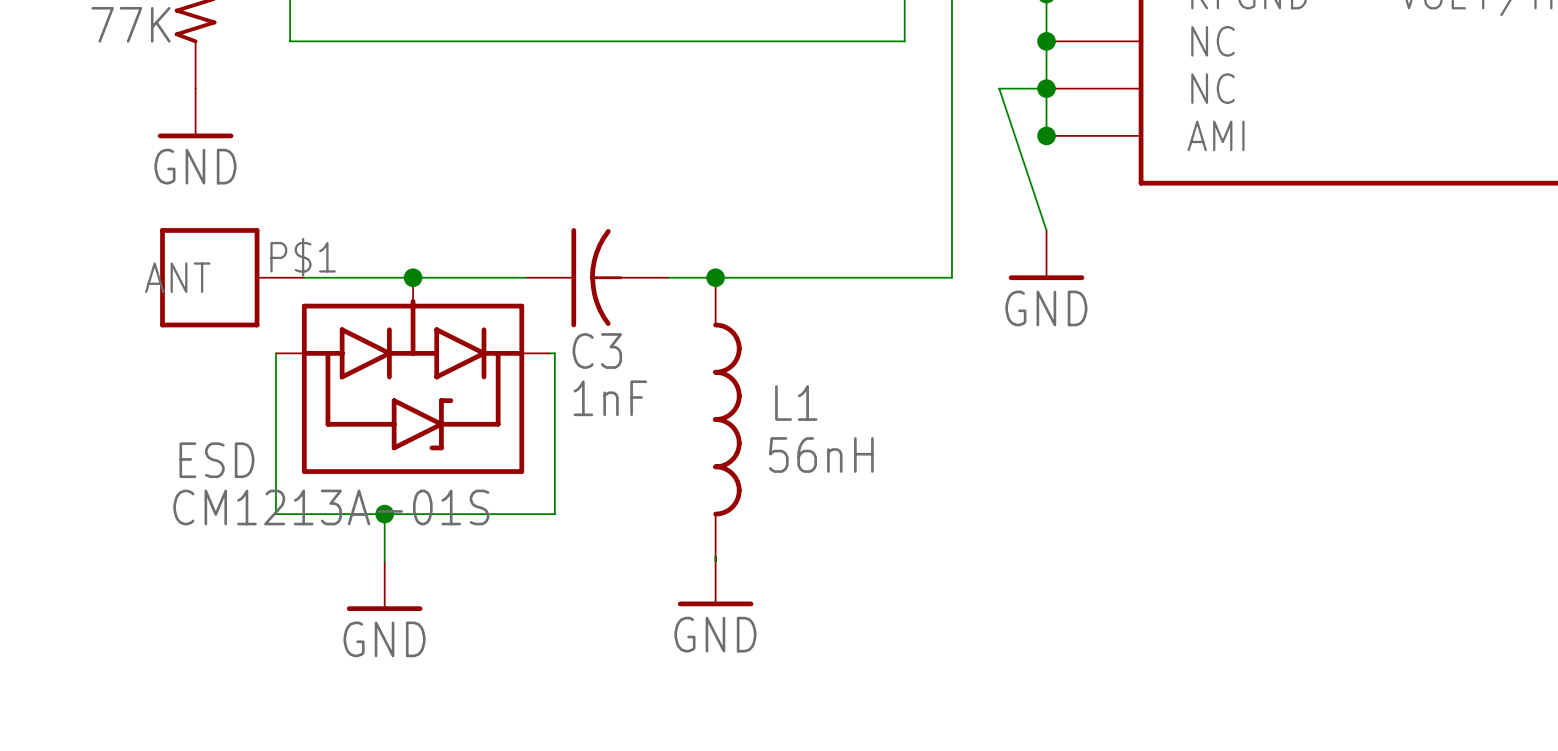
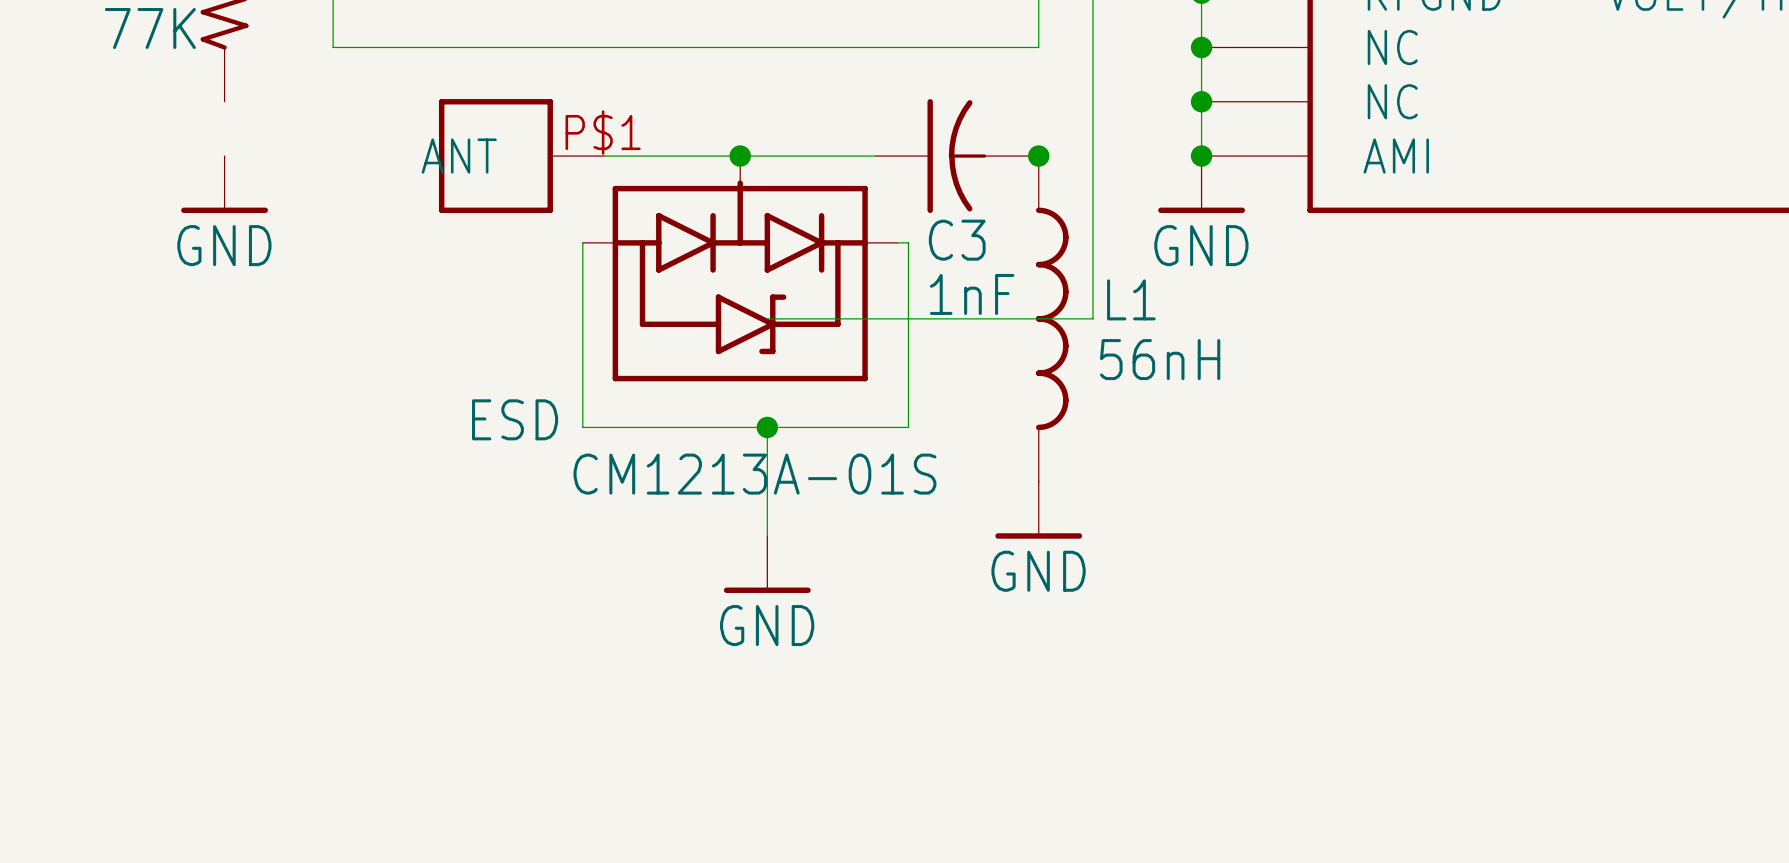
wire: (1046, 88) (999, 88) (1046, 230) -> none
power symbol position: GND (195, 113) -> GND (224, 184)
wire: none -> (604, 156) (875, 156)
junction: none -> (740, 156)
junction: none -> (1038, 156)
wire: none -> (582, 242) (582, 427) (908, 427) (908, 242) (897, 242)
power symbol position: GND (1046, 255) -> GND (1201, 184)
part position: (232, 277) -> (521, 156)
wire: (304, 277) (526, 277) -> none
junction: (413, 277) -> none
C3 position: (597, 277) -> (957, 156)
junction: (715, 277) -> none
wire: (275, 353) (275, 514) (554, 514) (554, 353) (550, 353) -> none
wire: none -> (767, 427) (767, 535)
junction: none -> (767, 427)
ESD position: (413, 375) -> (740, 268)
L1 position: (727, 419) -> (1052, 318)
power symbol: none -> GND (1038, 510)
ESD name position: ESD (216, 460) -> ESD (515, 419)
ESD value position: CM1213A-01S (331, 507) -> CM1213A-01S (754, 474)
wire: (384, 514) (384, 561) -> none
junction: (384, 514) -> none
wire: (715, 556) (715, 561) -> none
power symbol position: GND (715, 581) -> GND (767, 564)
power symbol: GND (384, 586) -> none

